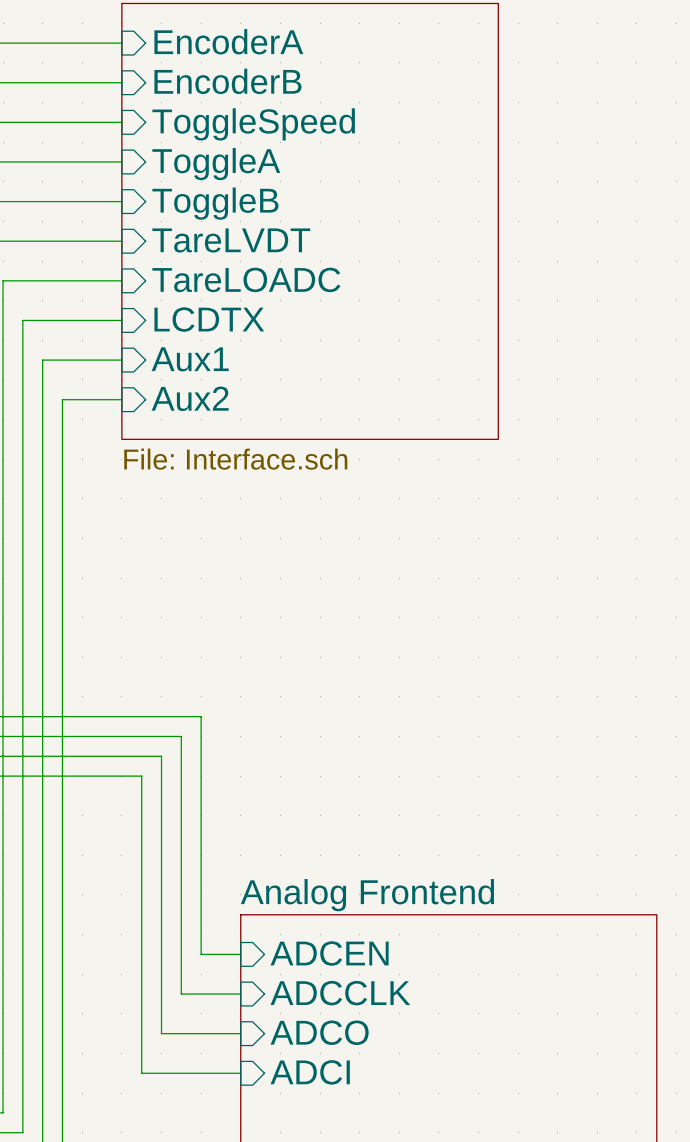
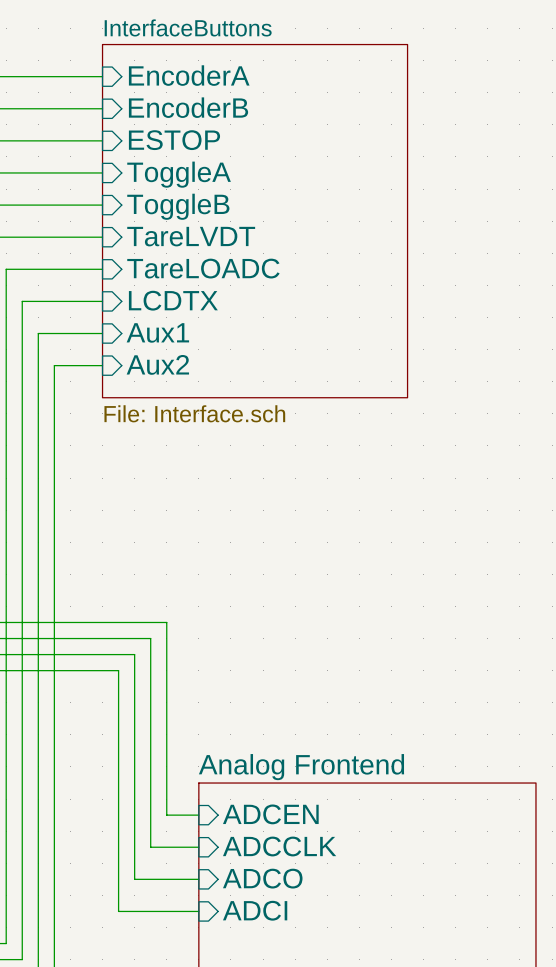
sheet pin: ToggleSpeed (253, 124) -> ESTOP (174, 140)

